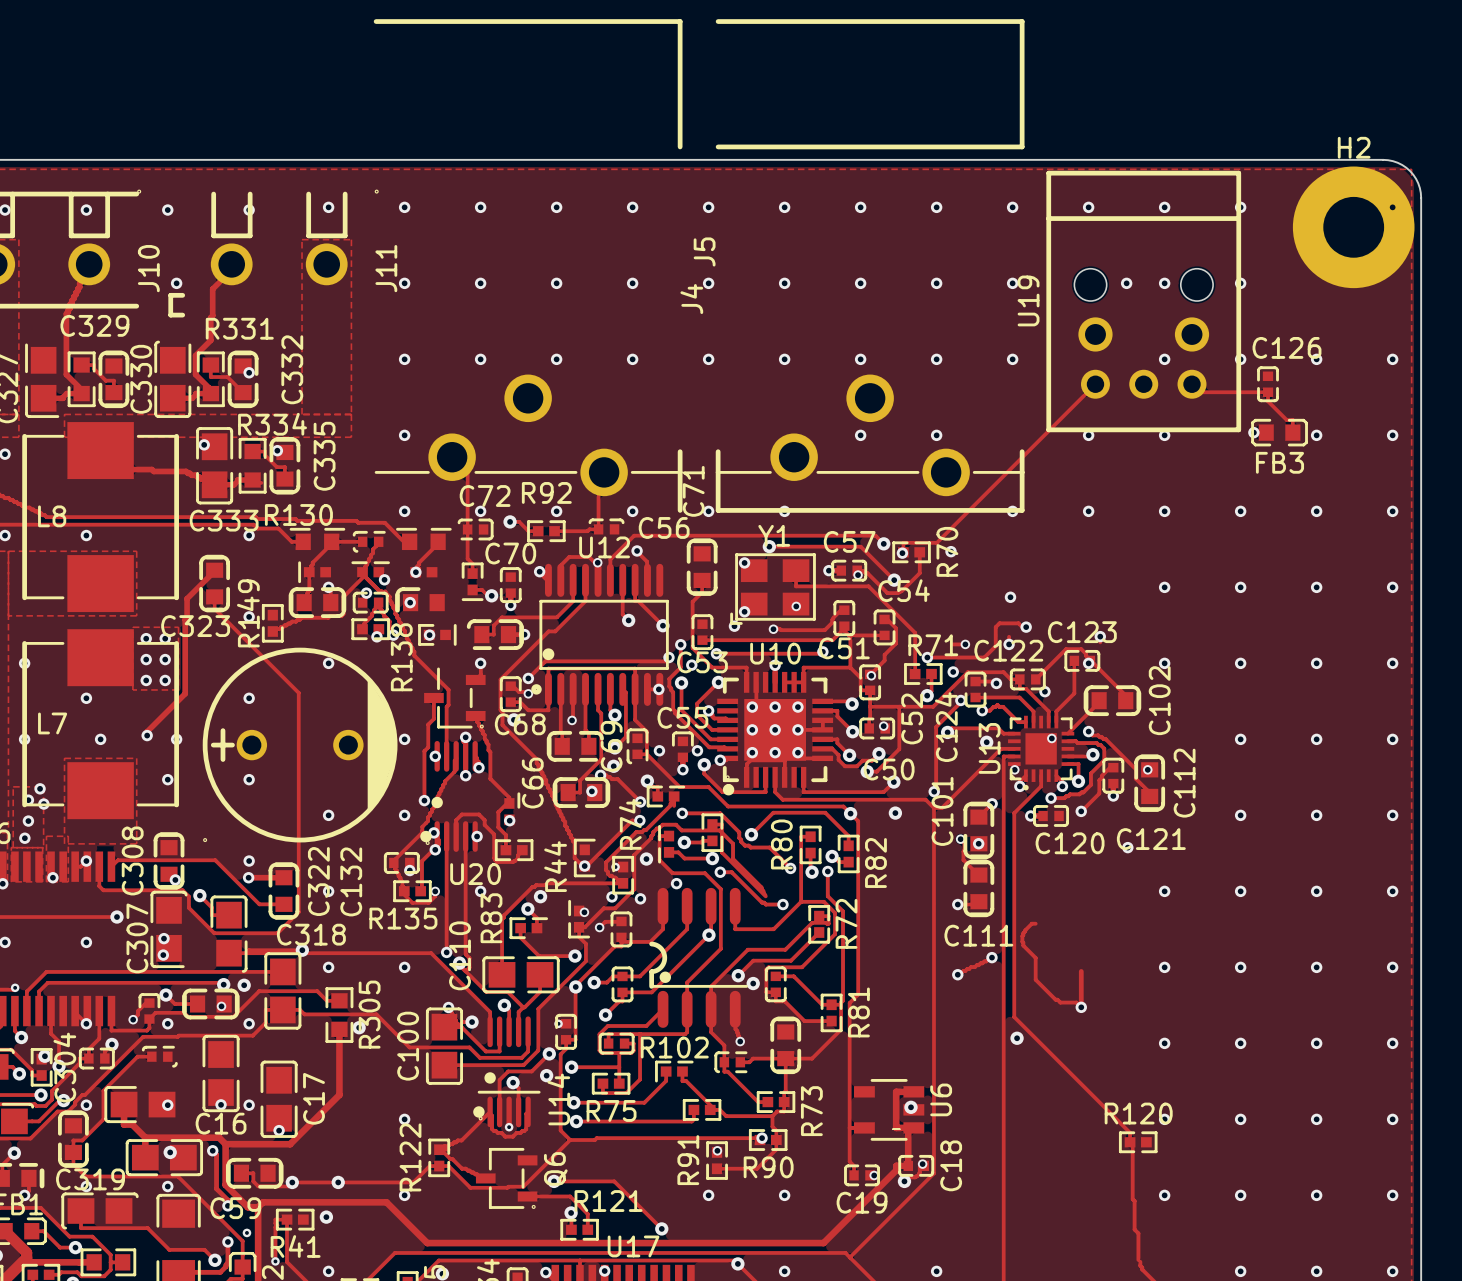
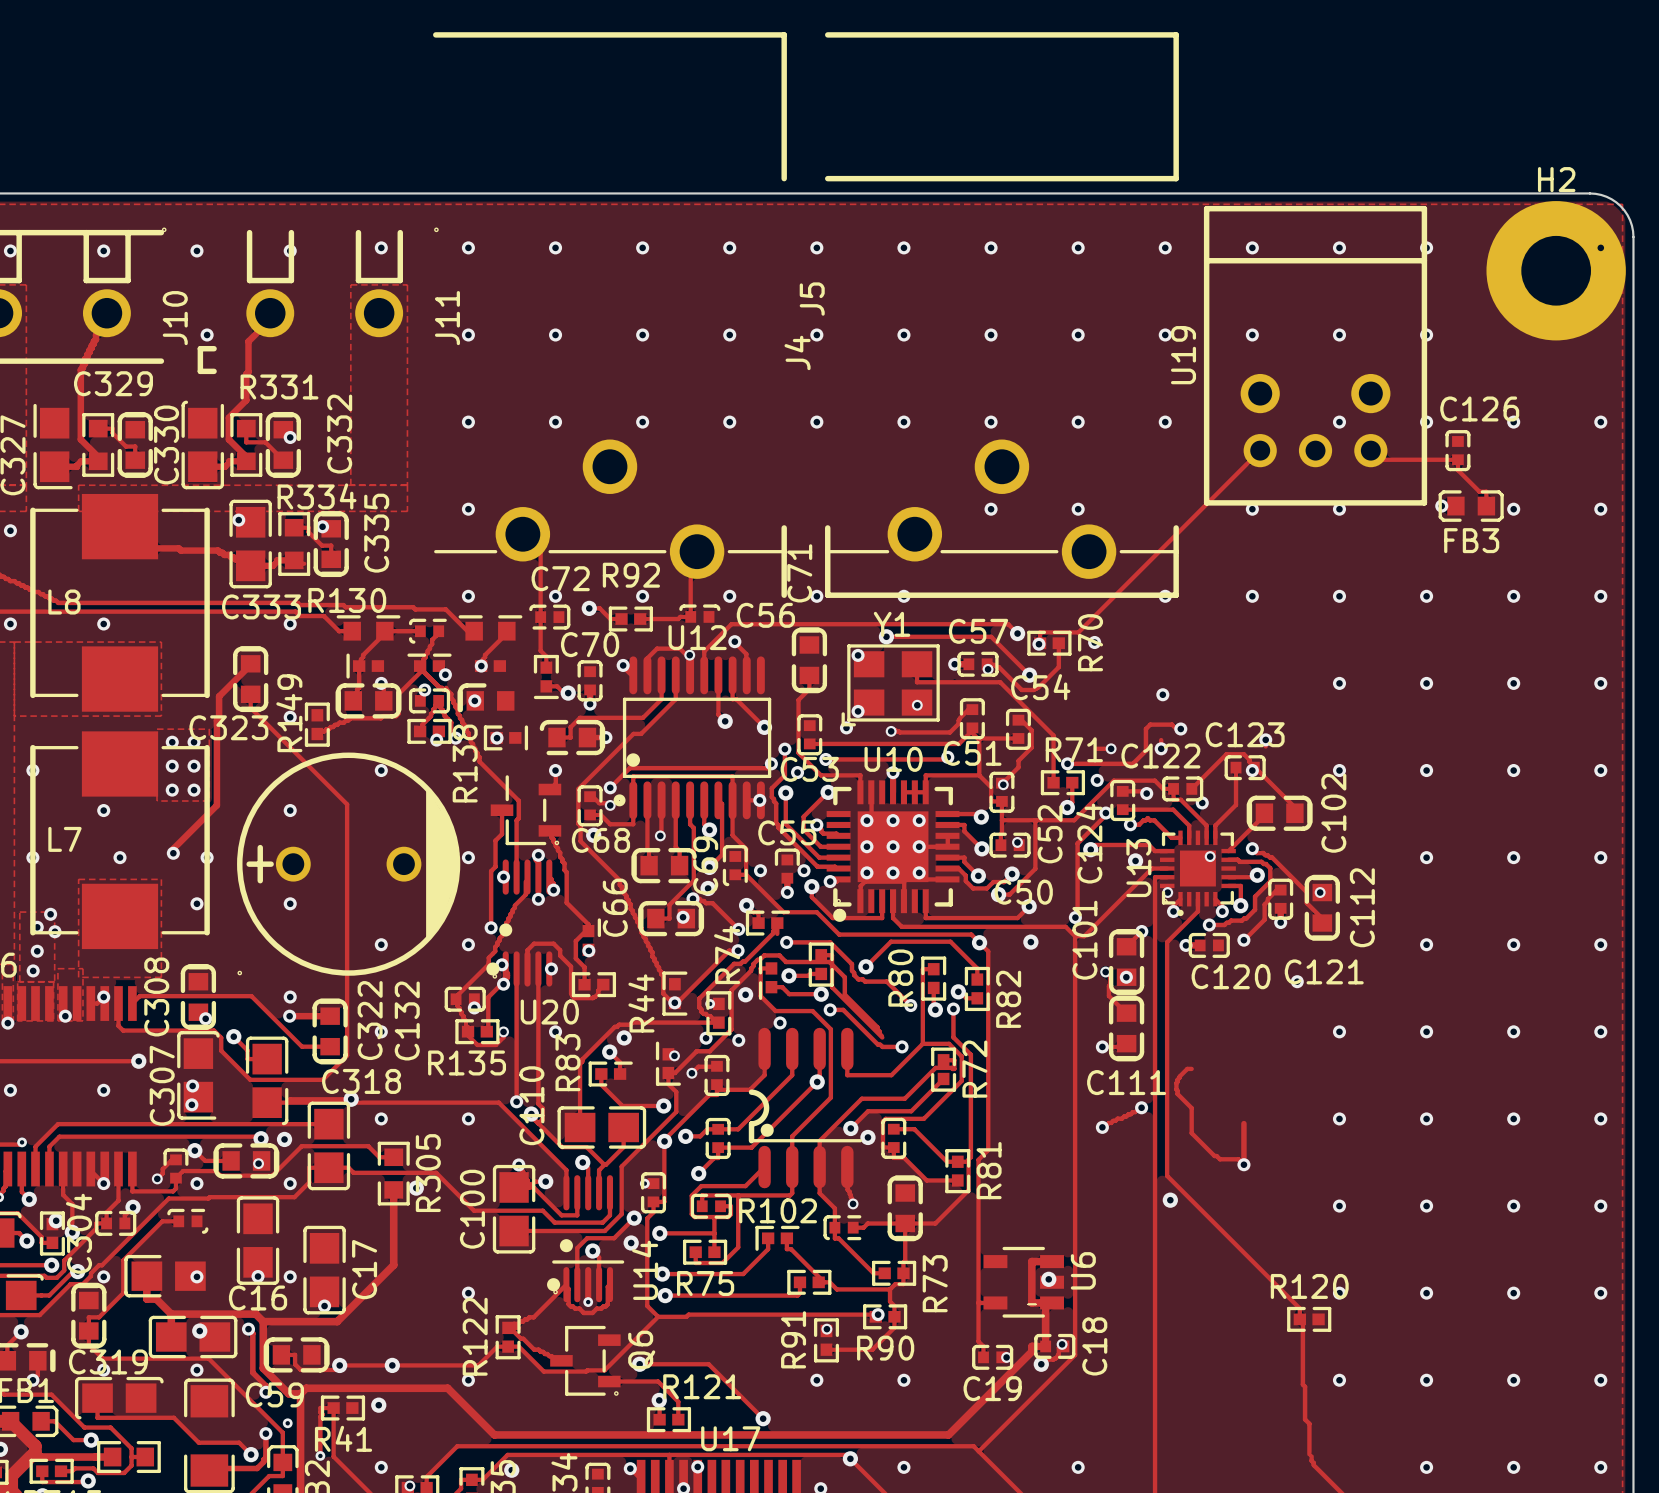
U19 footprint: [1046, 170, 1242, 433] -> [1203, 205, 1428, 506]
via position: (1126, 283) -> (1252, 334)

